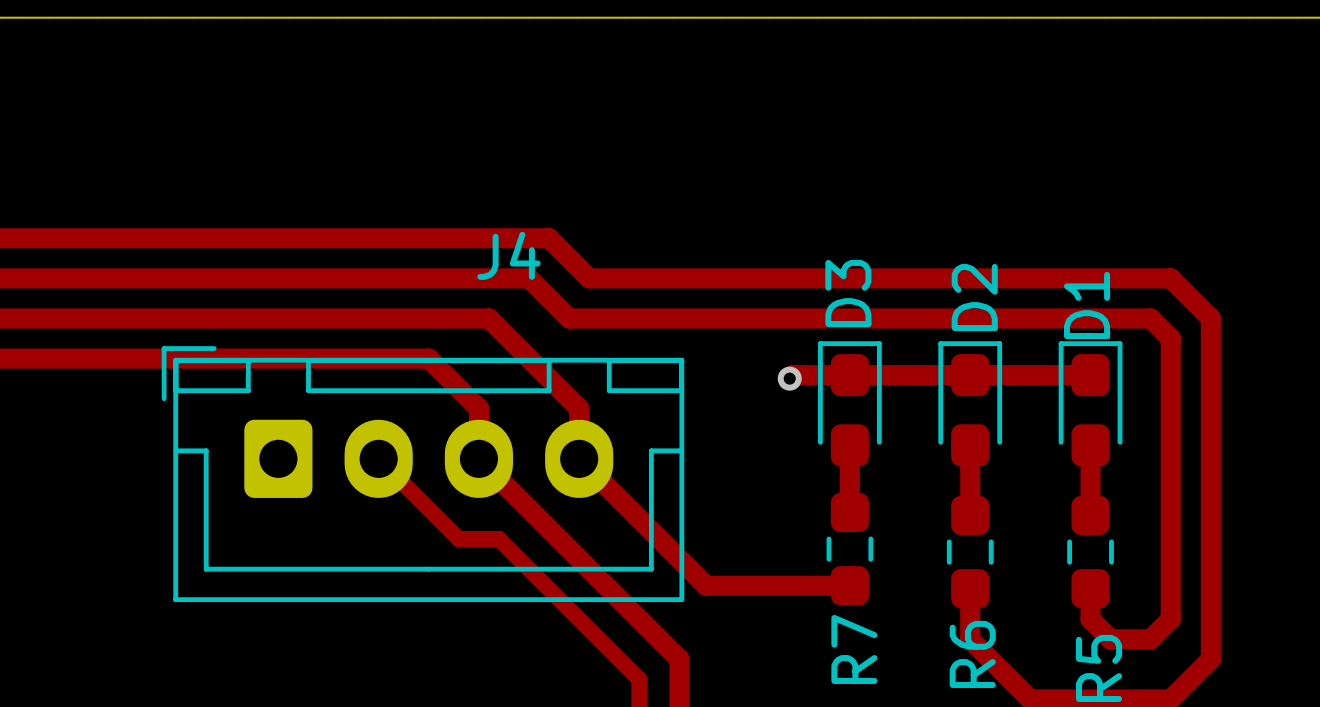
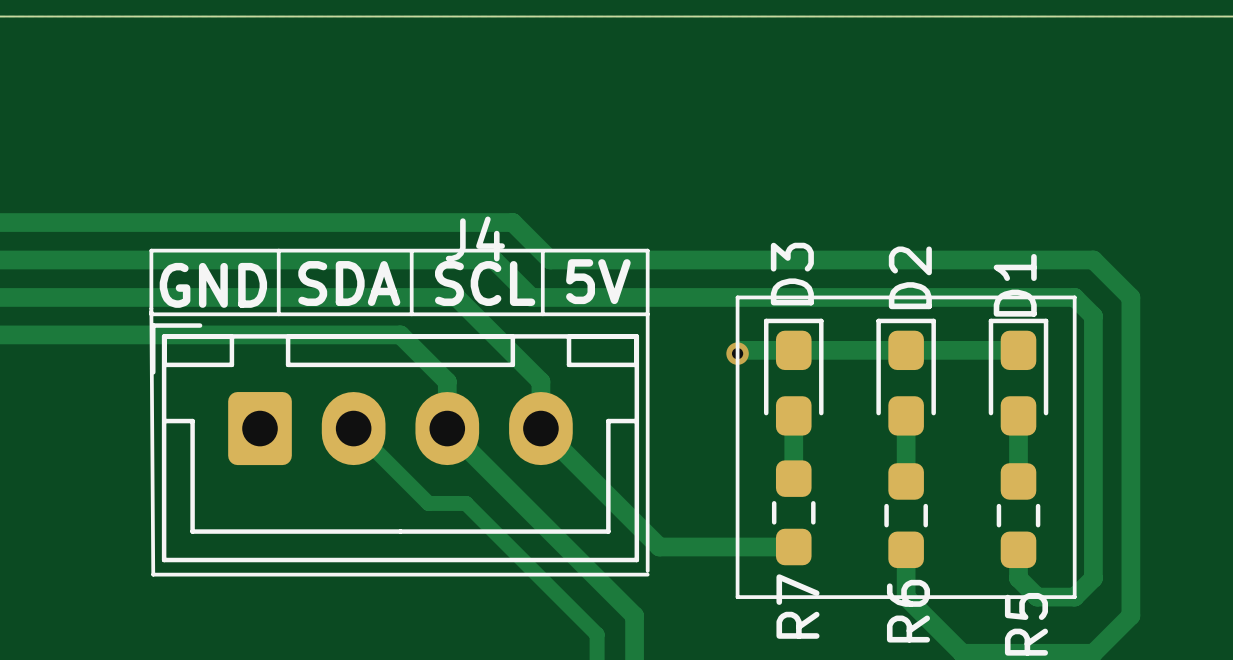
line: none -> (278, 250) (278, 314)
line: none -> (411, 252) (411, 314)
line: none -> (542, 252) (542, 314)
text: none -> 5V (598, 281)
text: none -> SDA (349, 283)
text: none -> SCL (485, 283)
text: none -> GND (213, 285)
line: none -> (737, 297) (1074, 297) (1074, 597) (737, 597) (737, 297)
line: none -> (151, 311) (153, 574) (647, 574)
line: none -> (647, 314) (151, 314) (151, 250) (647, 250) (647, 570)

